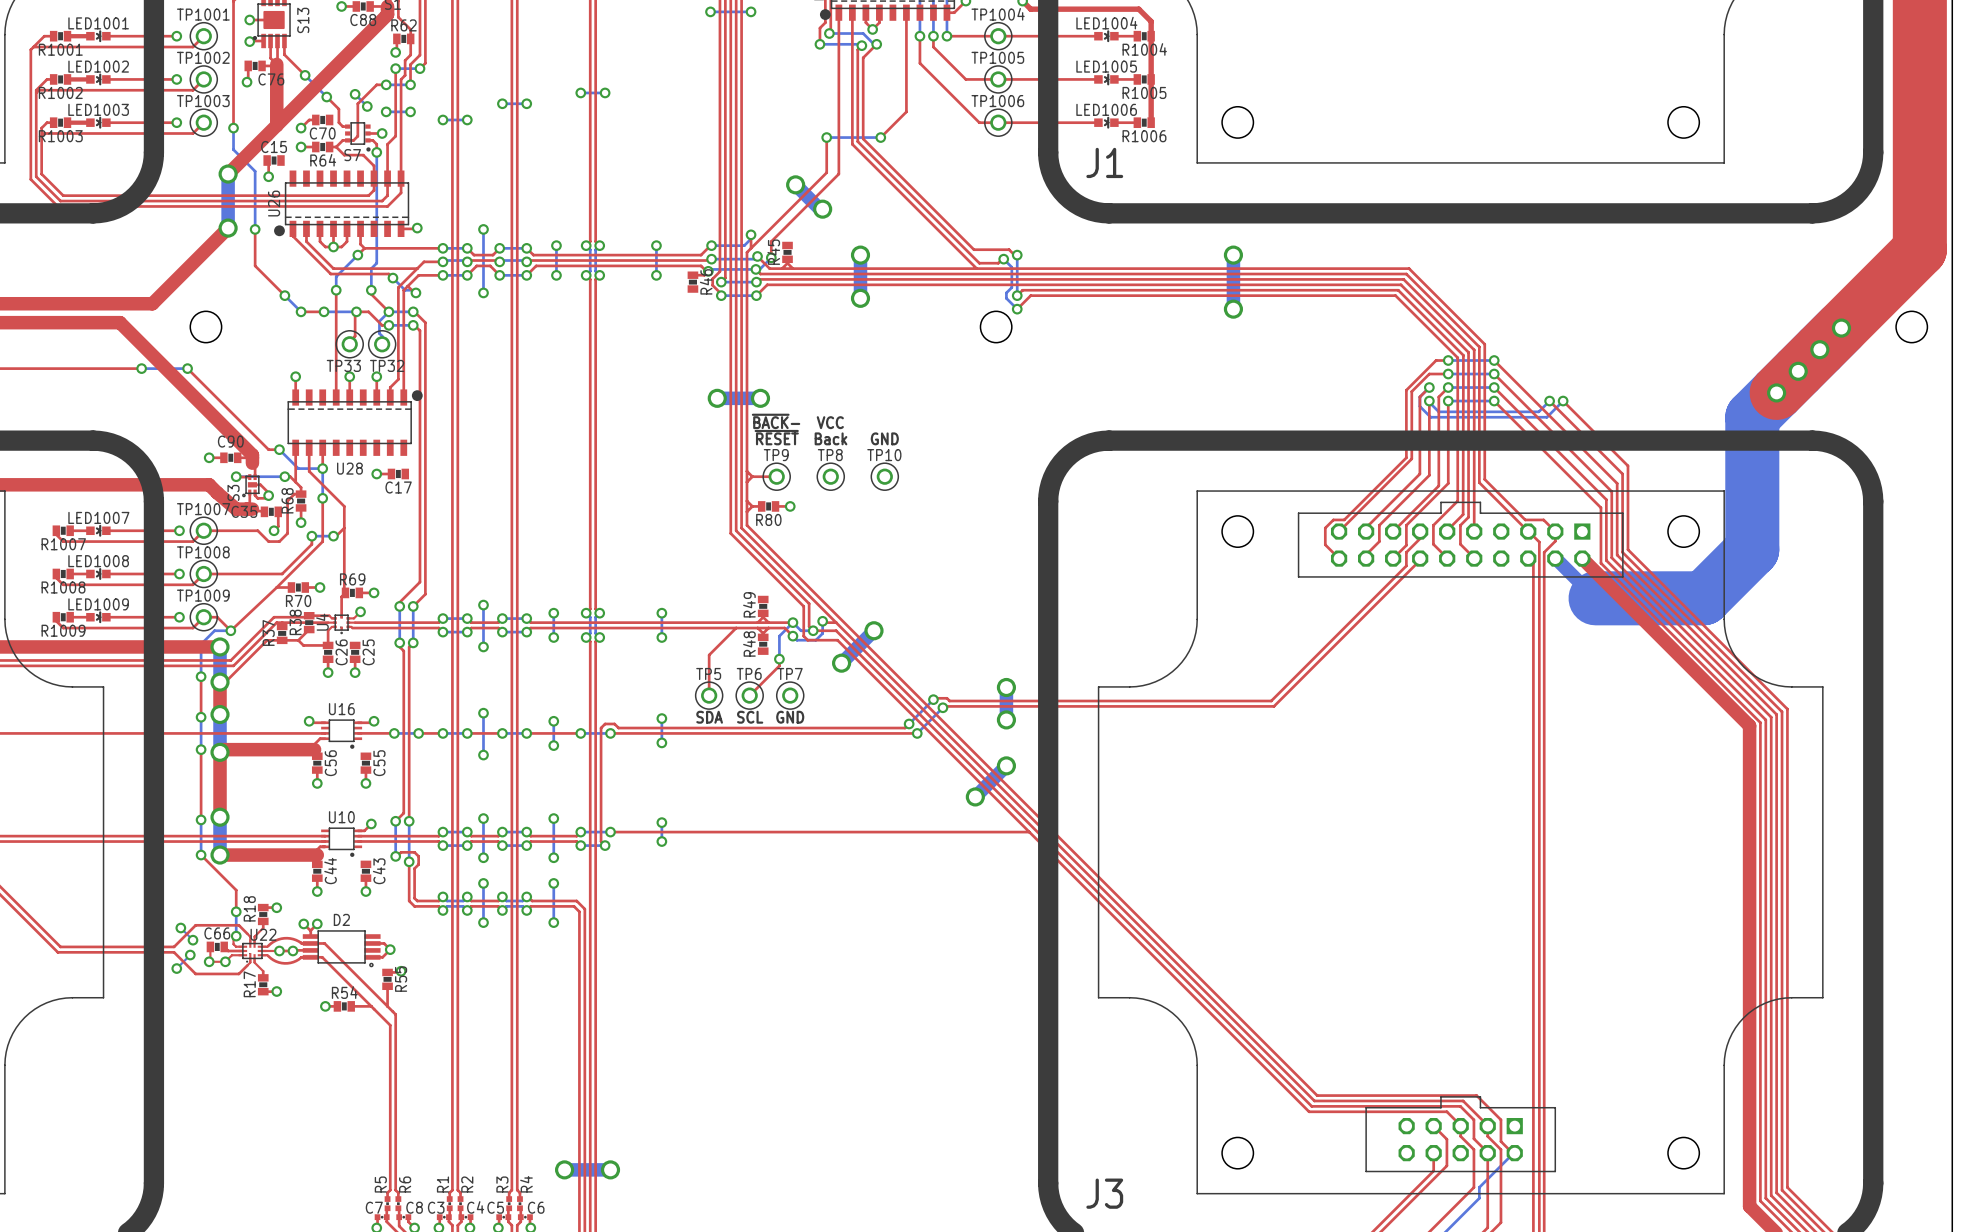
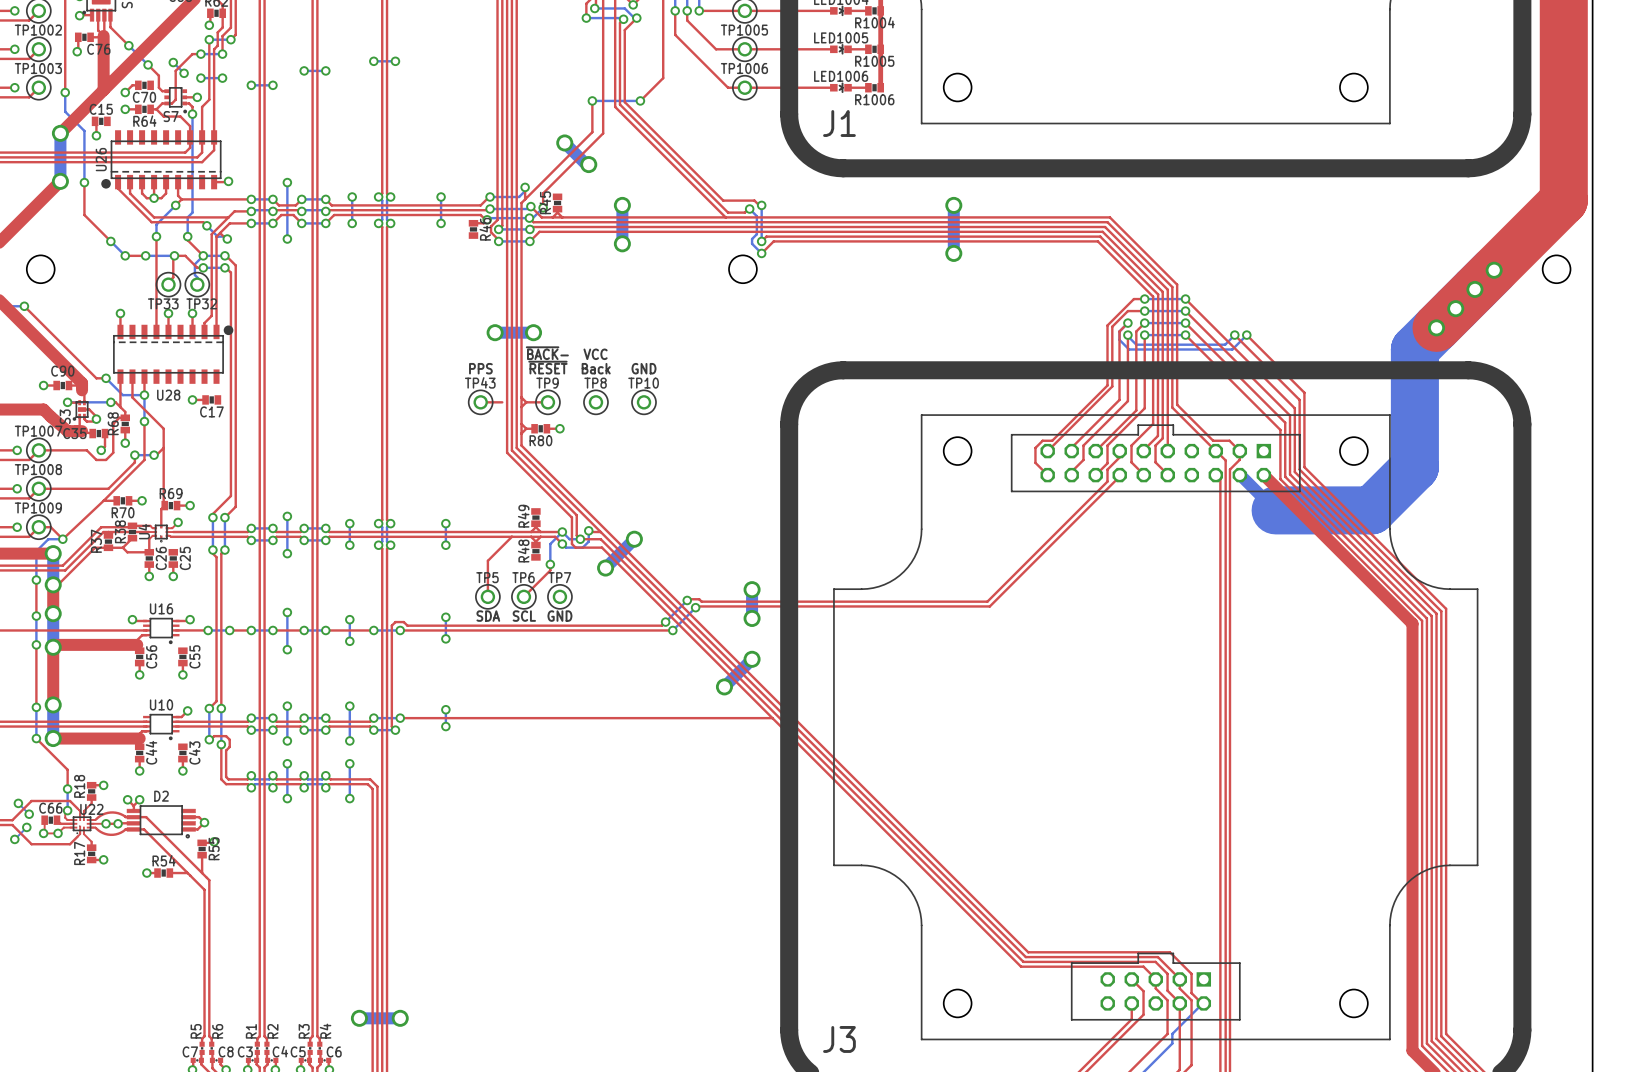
text: none -> PPS (480, 368)
top track: none -> (480, 402) (502, 402)
TP43: none -> (480, 402)

